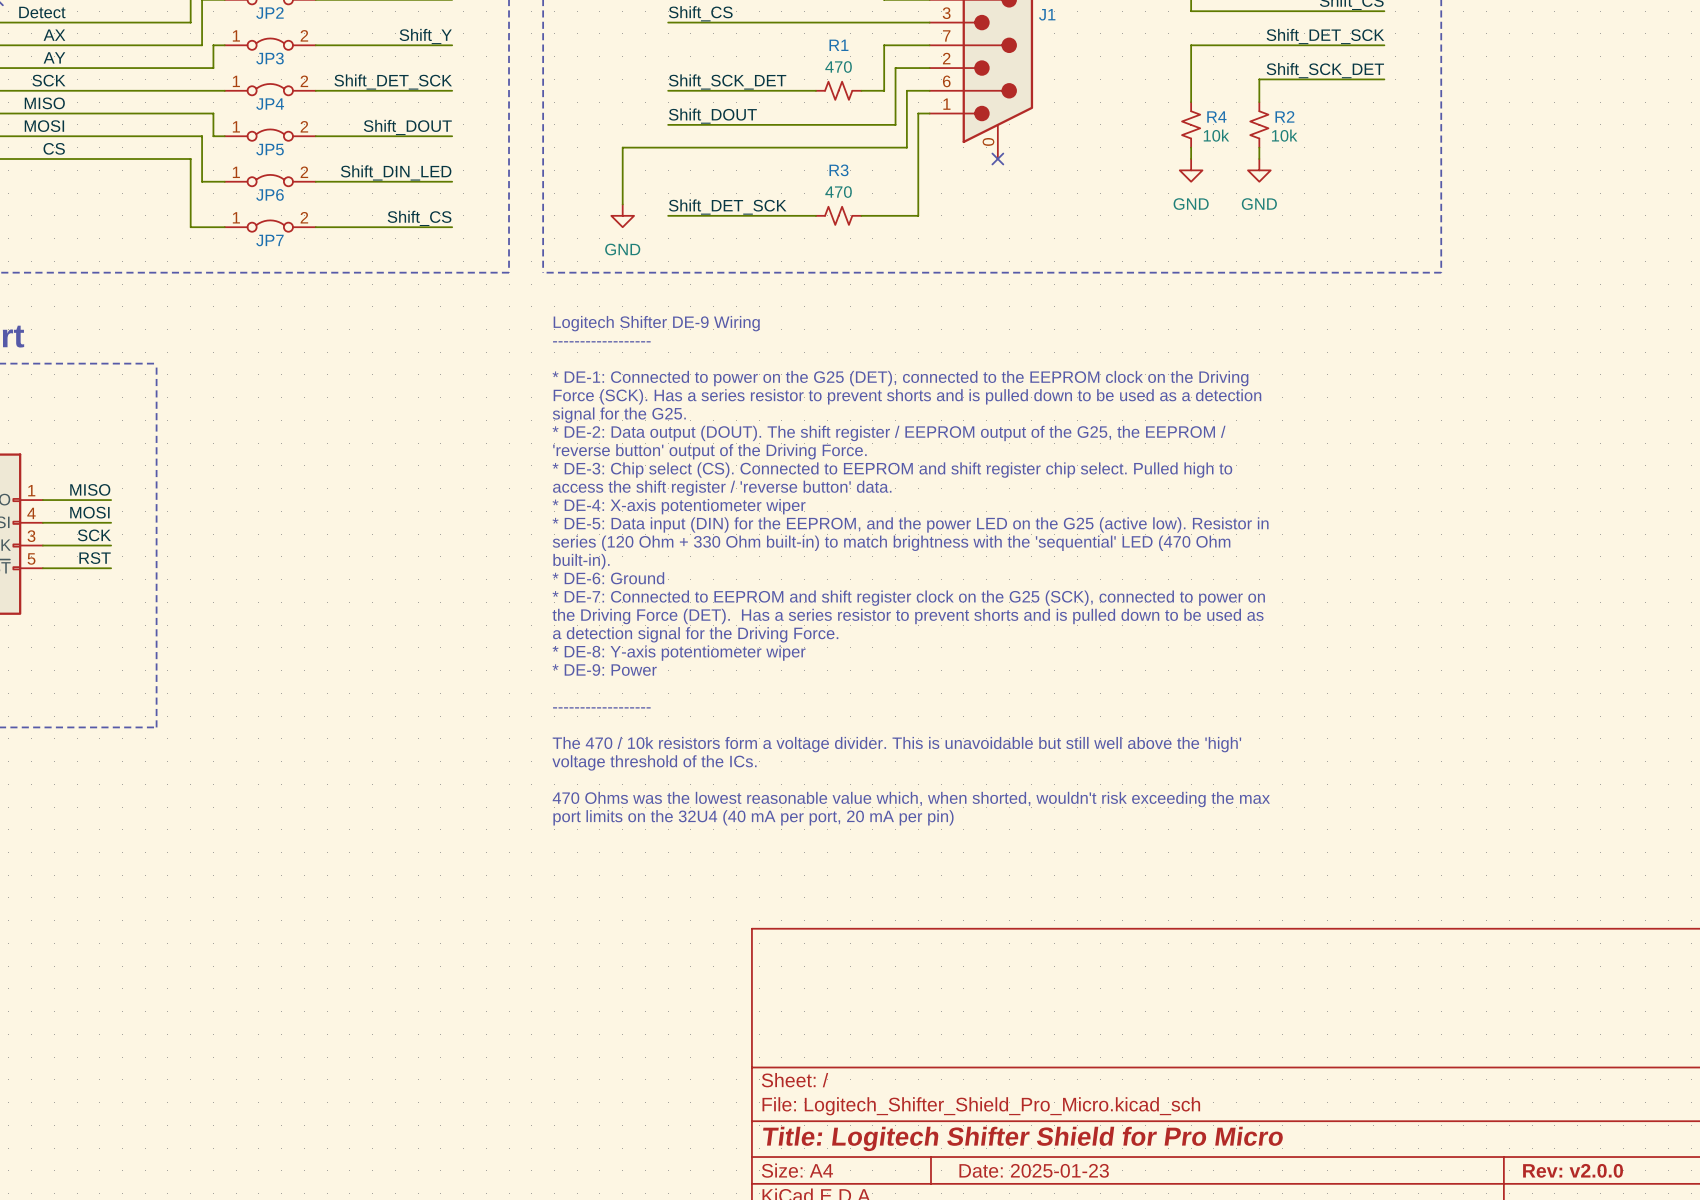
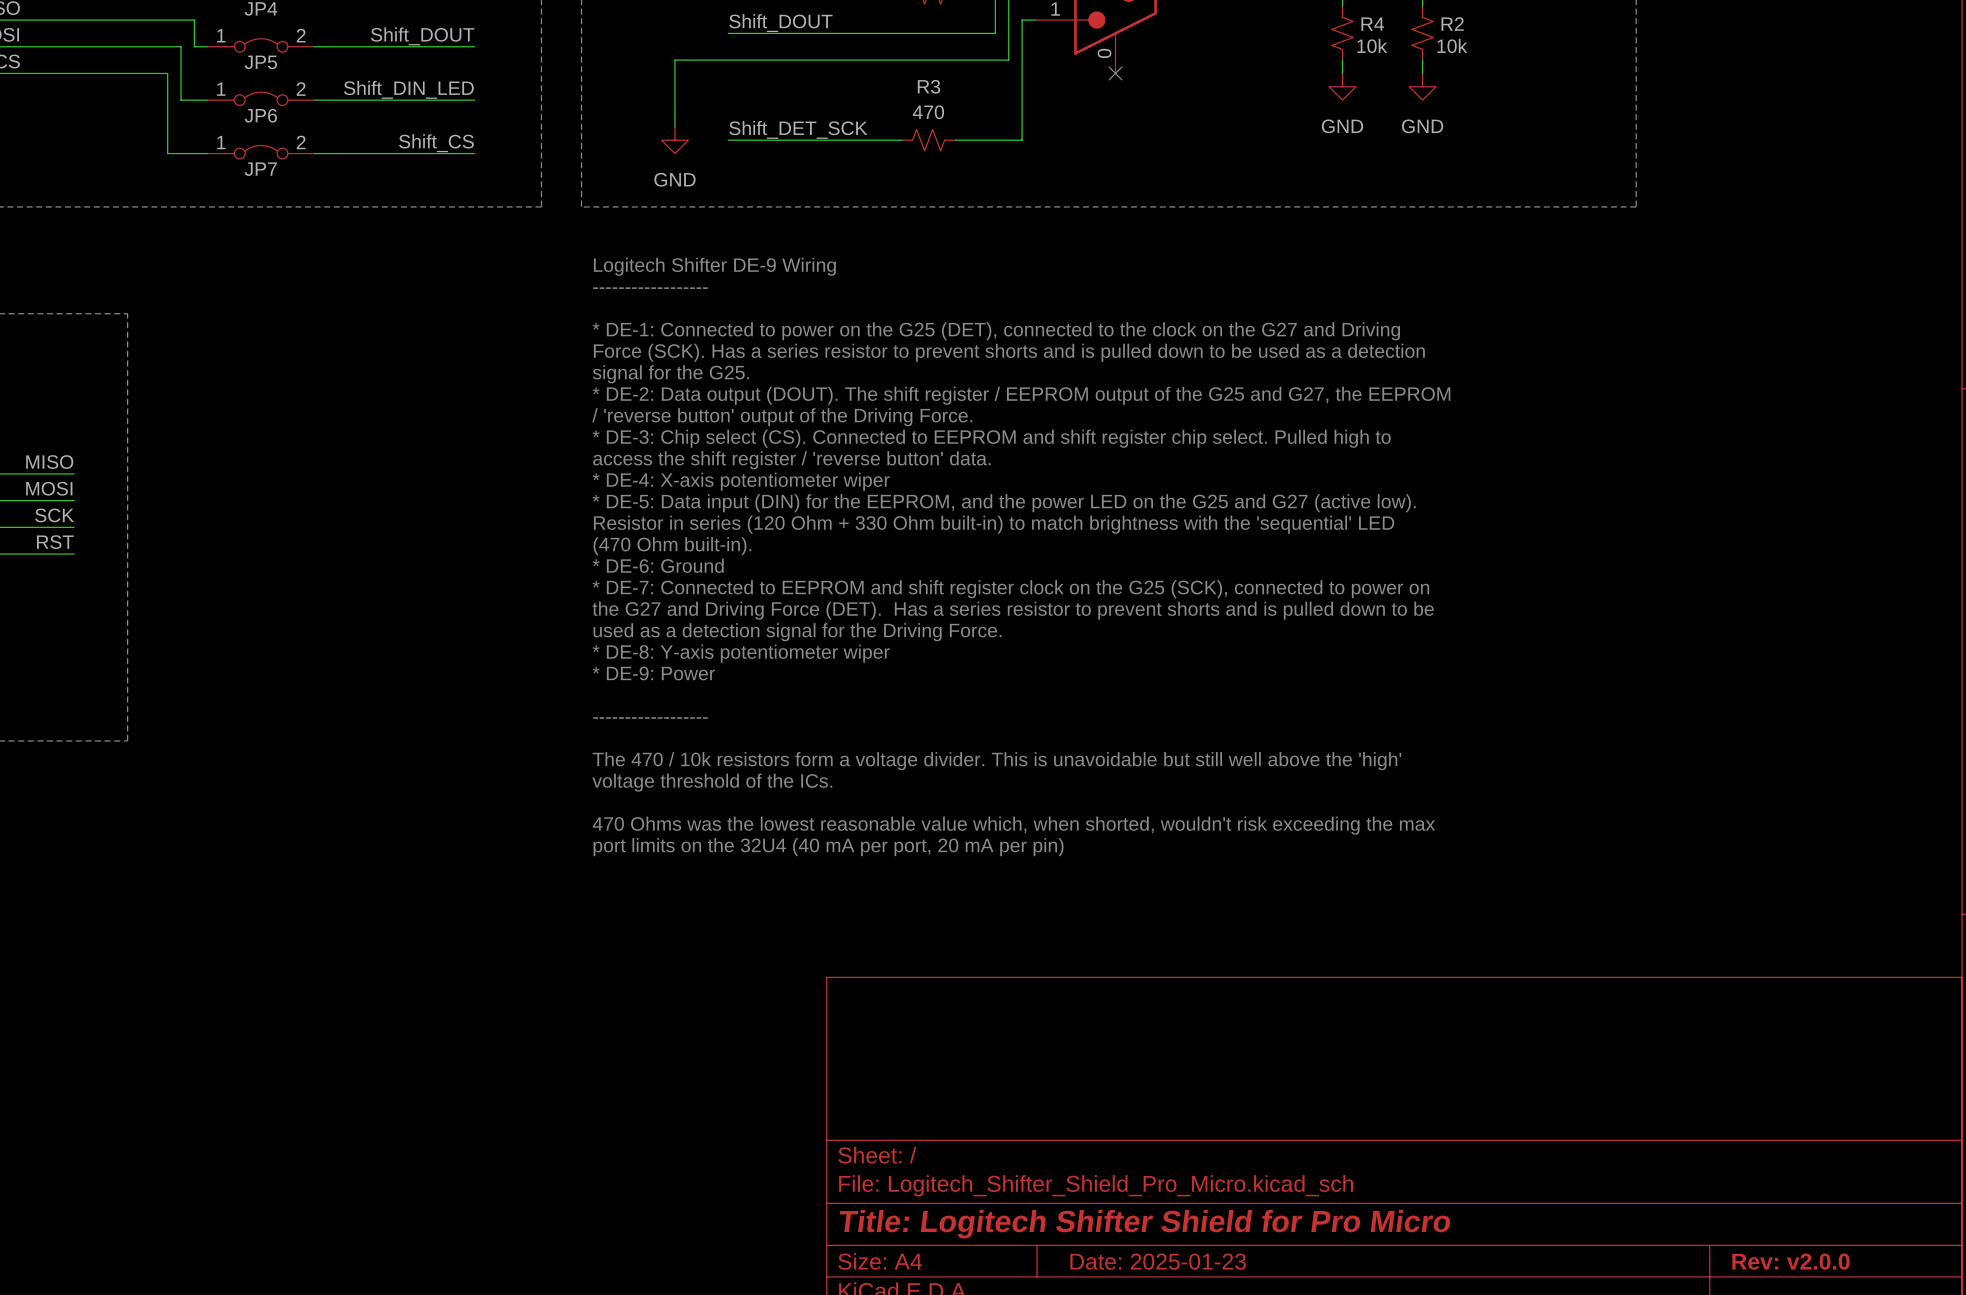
text: * DE-1: Connected to power on the G25 (DET), connected to the EEPROM clock on the Driving (900, 378) -> * DE-1: Connected to power on the G25 (DET), connected to the clock on the G27 and Driving (996, 331)
text: * DE-2: Data output (DOUT). The shift register / EEPROM output of the G25, the EEPROM / (889, 433) -> * DE-2: Data output (DOUT). The shift register / EEPROM output of the G25 and G27, the EEPROM (1021, 395)
text: 'reverse button' output of the Driving Force. (709, 451) -> / 'reverse button' output of the Driving Force. (782, 417)
text: * DE-5: Data input (DIN) for the EEPROM, and the power LED on the G25 (active low). Resistor in (910, 524) -> * DE-5: Data input (DIN) for the EEPROM, and the power LED on the G25 and G27 (active low). (1004, 503)
text: series (120 Ohm + 330 Ohm built-in) to match brightness with the 'sequential' LED (470 Ohm (891, 543) -> Resistor in series (120 Ohm + 330 Ohm built-in) to match brightness with the 'sequential' LED (994, 524)
text: built-in). (581, 561) -> (470 Ohm built-in). (672, 546)
text: the Driving Force (DET). Has a series resistor to prevent shorts and is pulled down to be used as (908, 616) -> the G27 and Driving Force (DET). Has a series resistor to prevent shorts and is pulled down to be (1013, 610)
text: a detection signal for the Driving Force. (695, 634) -> used as a detection signal for the Driving Force. (797, 632)

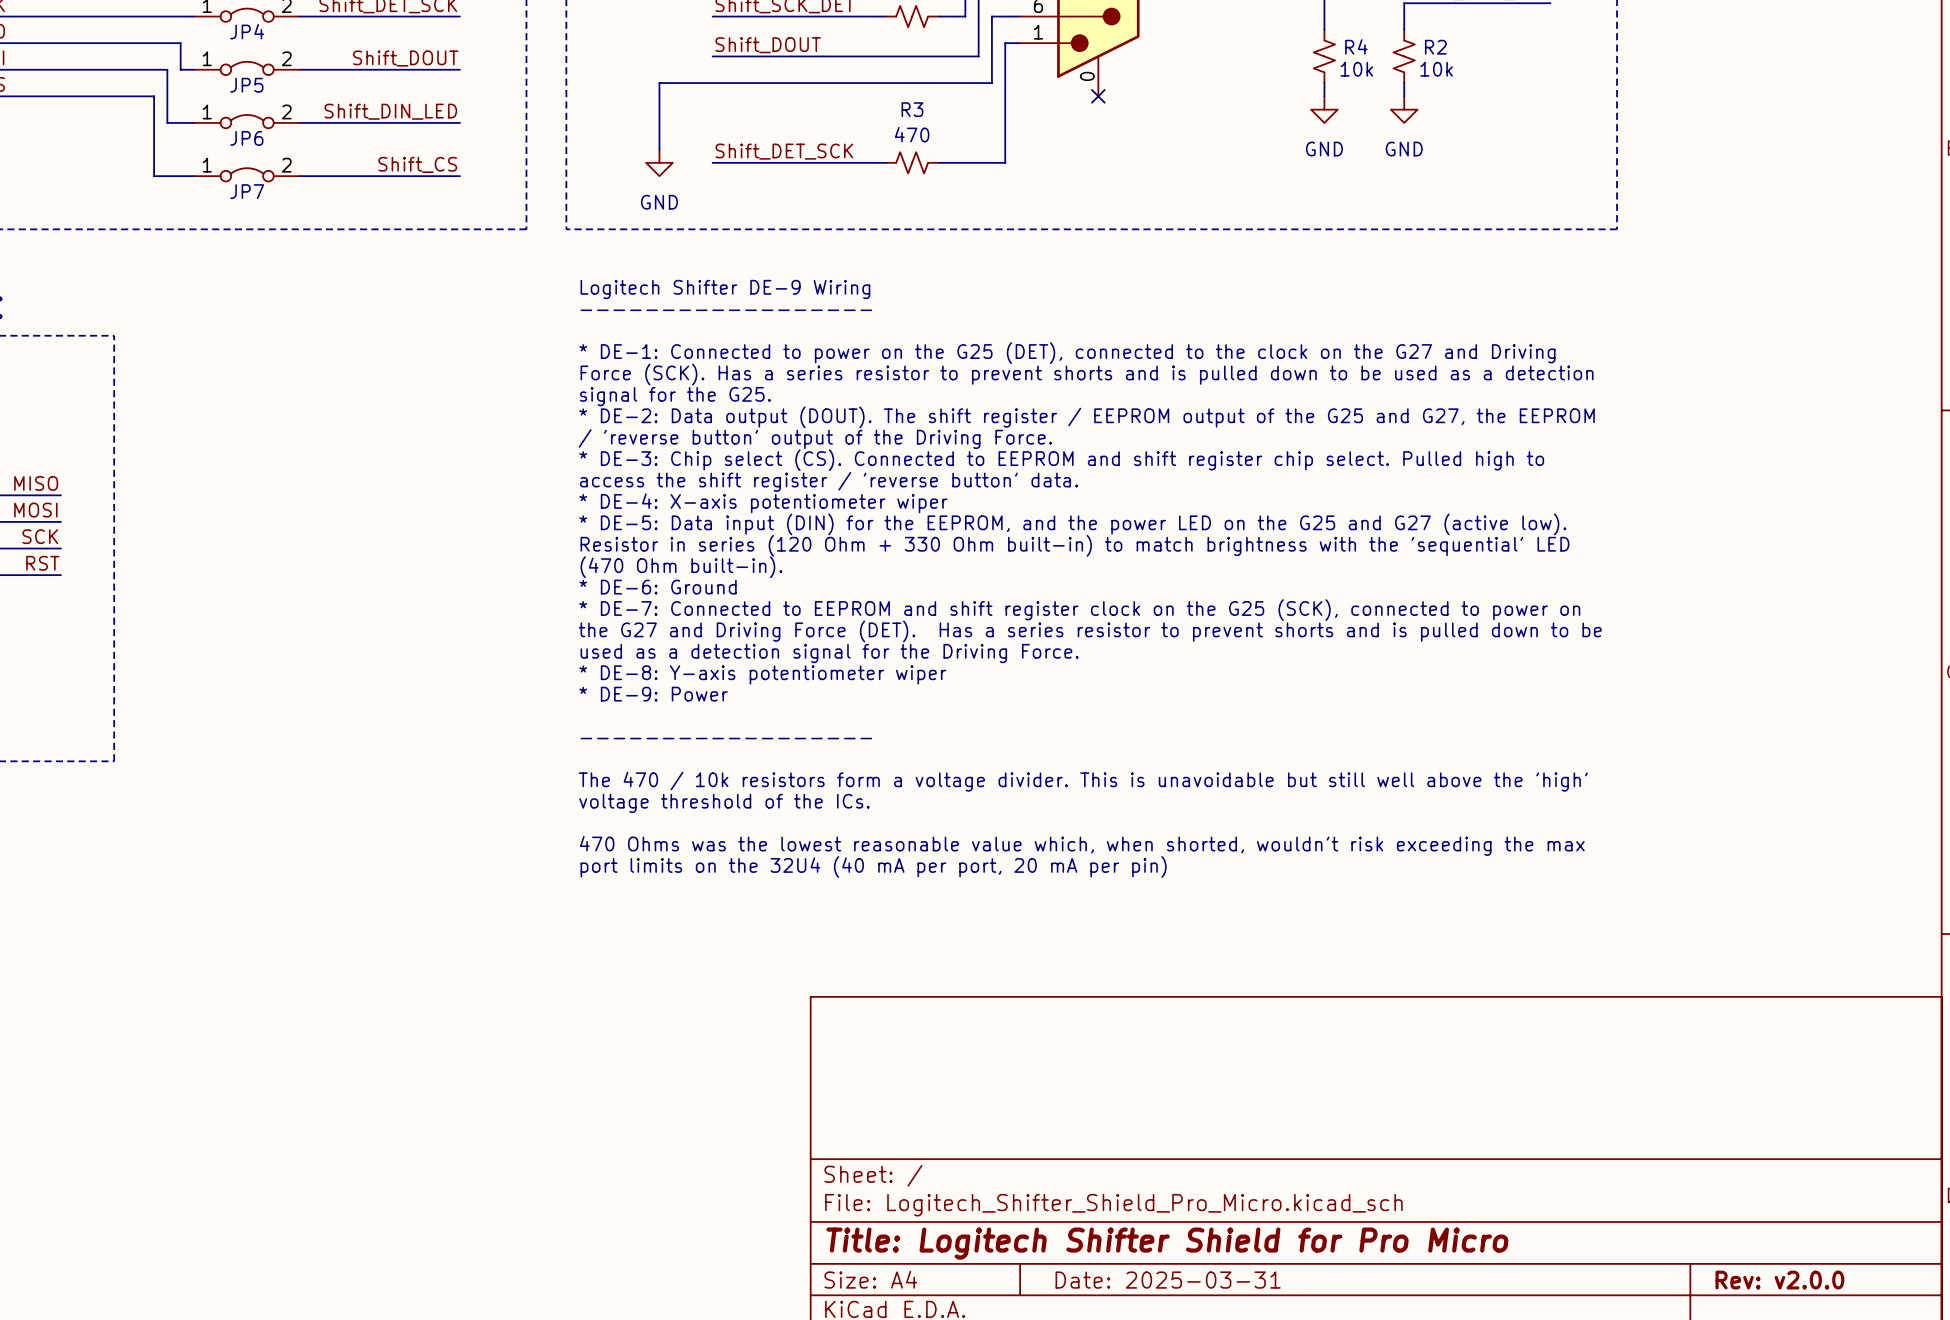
title block: Date: 2025-01-23 (1158, 1261) -> Date: 2025-03-31 (1168, 1280)

